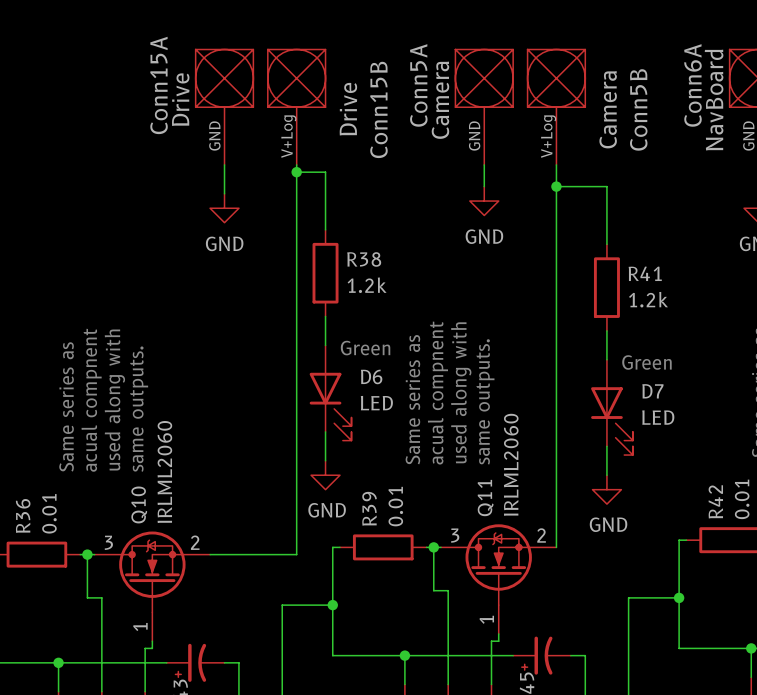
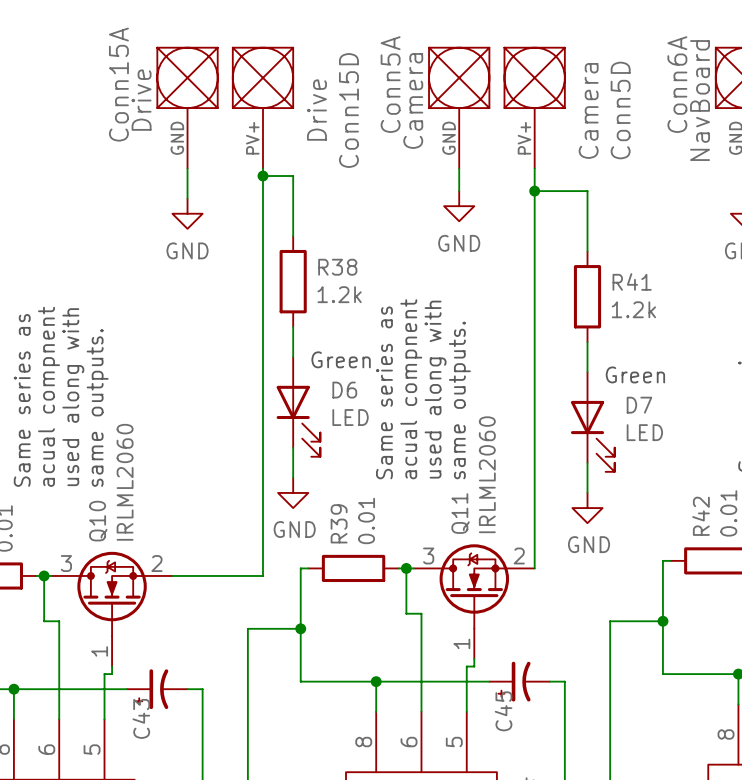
Conn15B name: Conn15B (378, 109) -> Conn15D (348, 110)
Conn5B name: Conn5B (638, 109) -> Conn5D (620, 110)
Conn15B pin name: V+Log (288, 136) -> PV+ (252, 138)
Conn5B pin name: V+Log (548, 136) -> PV+ (524, 138)

